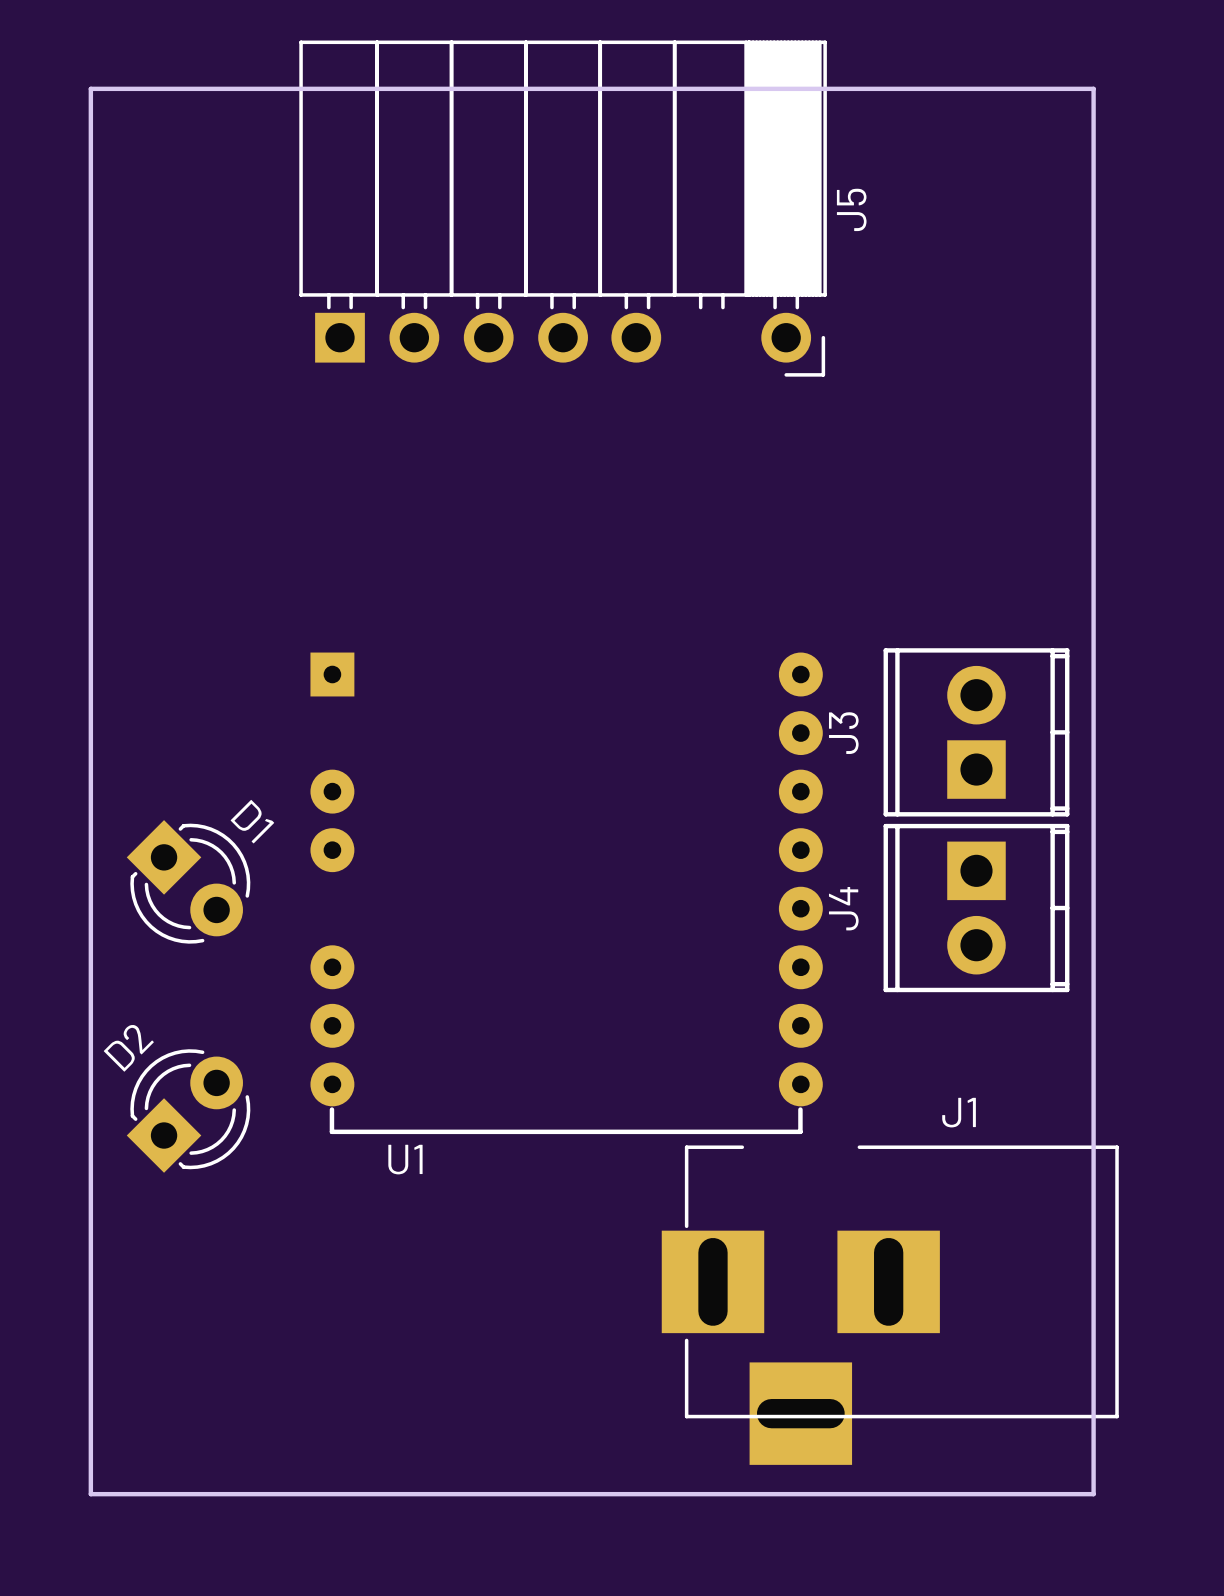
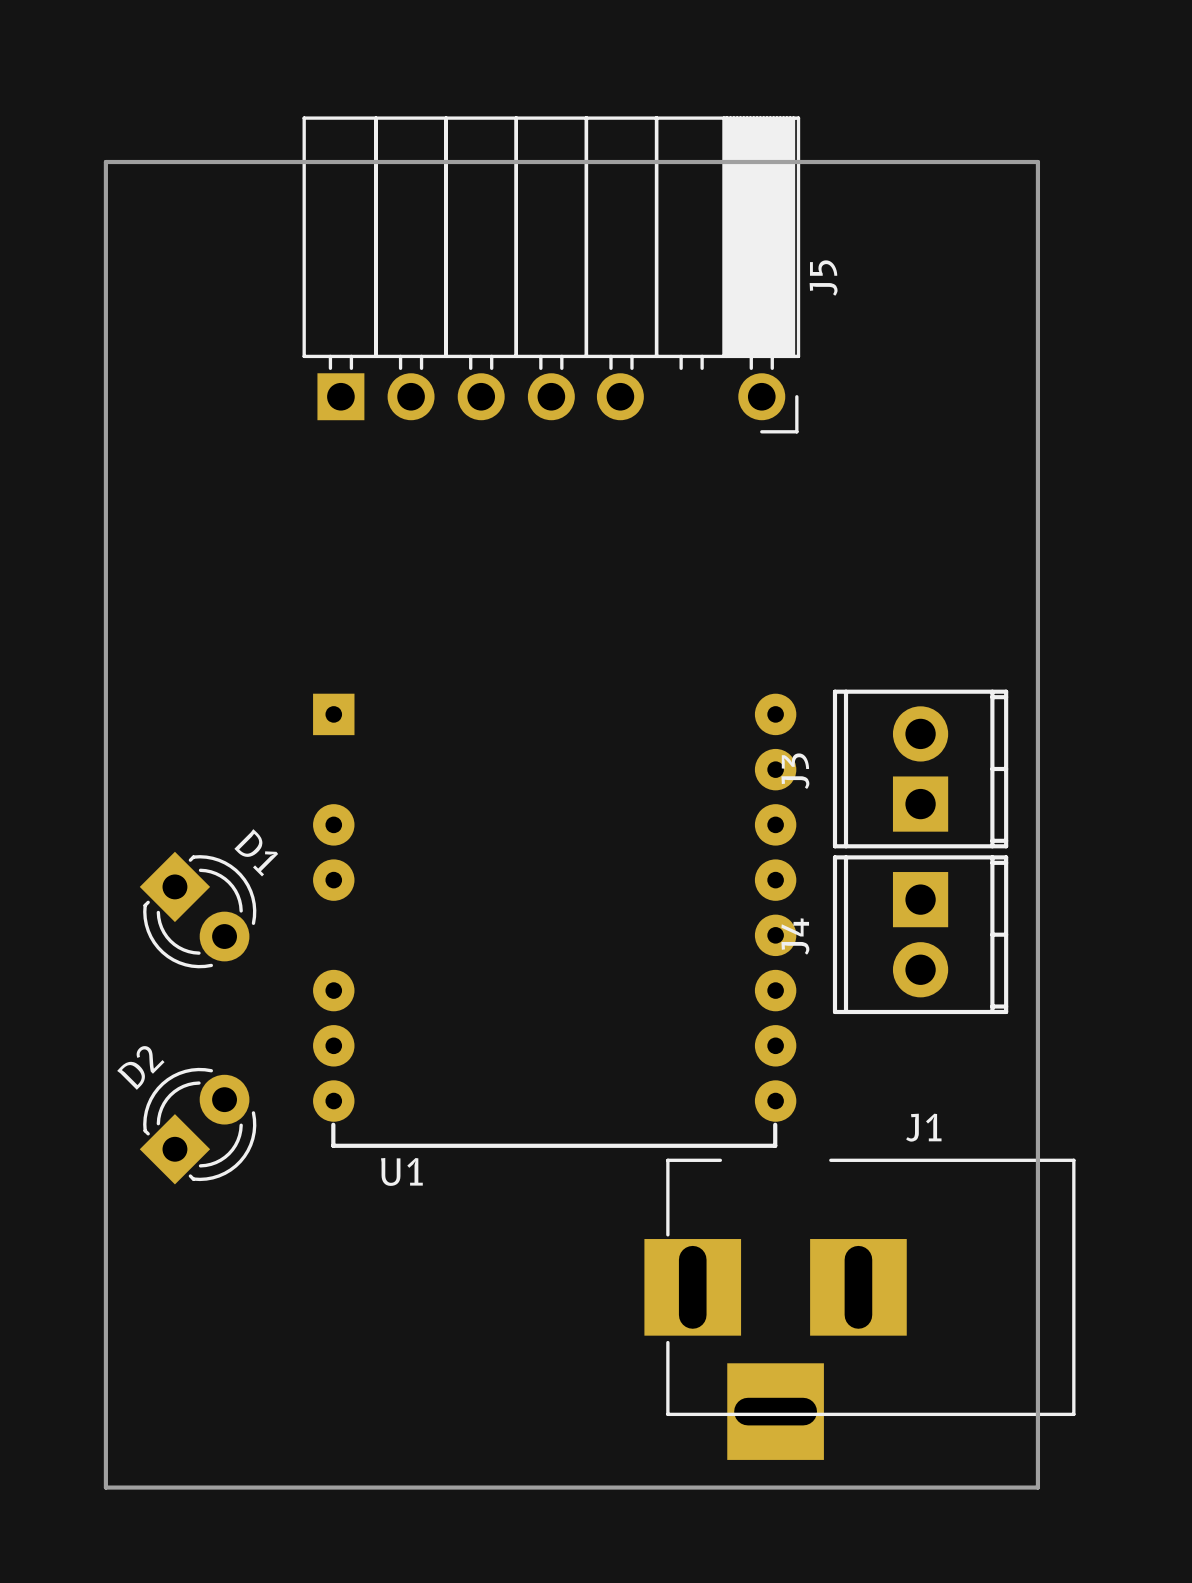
board edge: (1078, 88) (1093, 88) (1093, 1494) (1078, 1494) -> (1037, 162) (1037, 1487)
J3 position: (976, 732) -> (920, 768)
J4 position: (976, 908) -> (920, 934)

